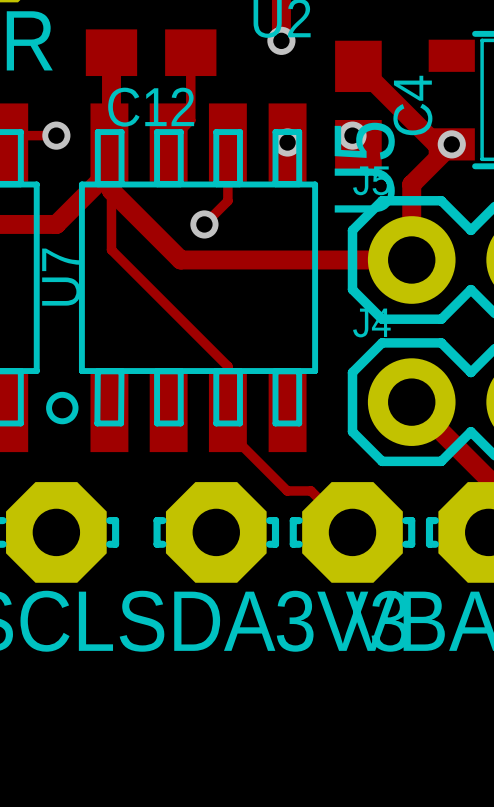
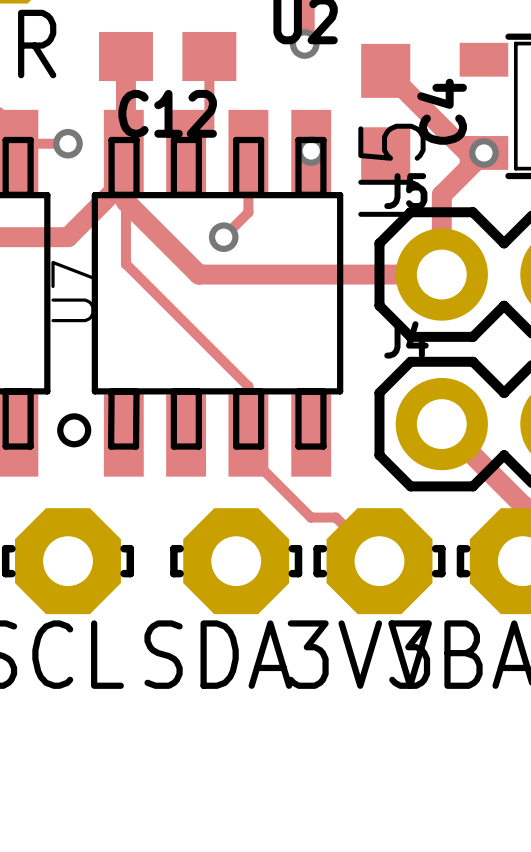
via: (352, 135) -> none

